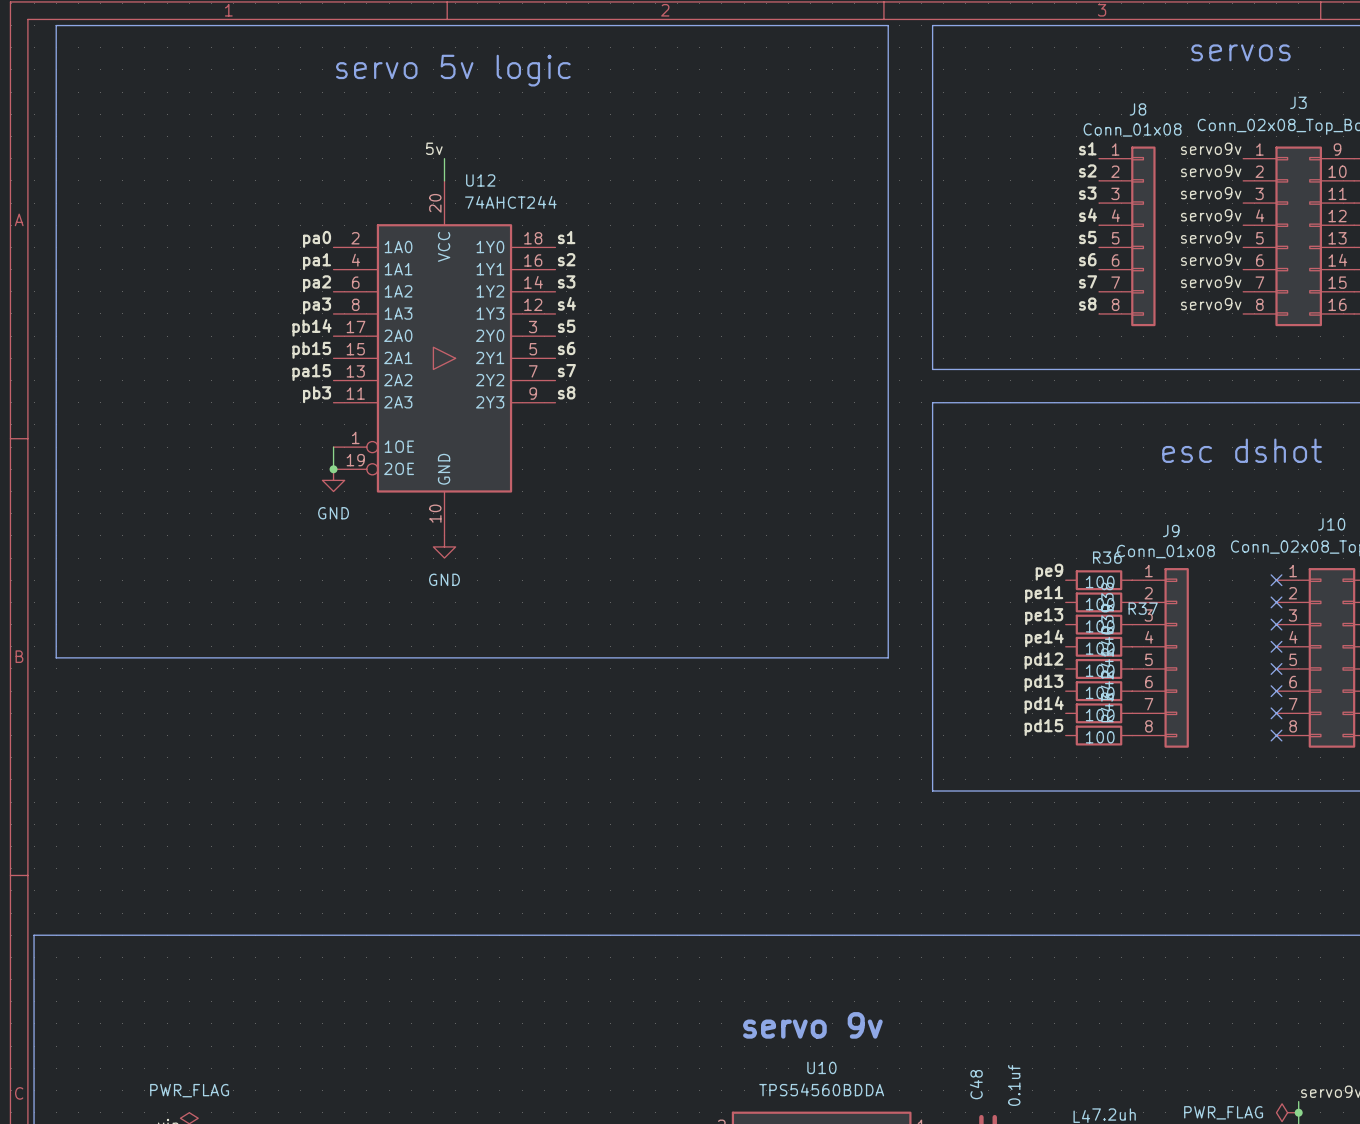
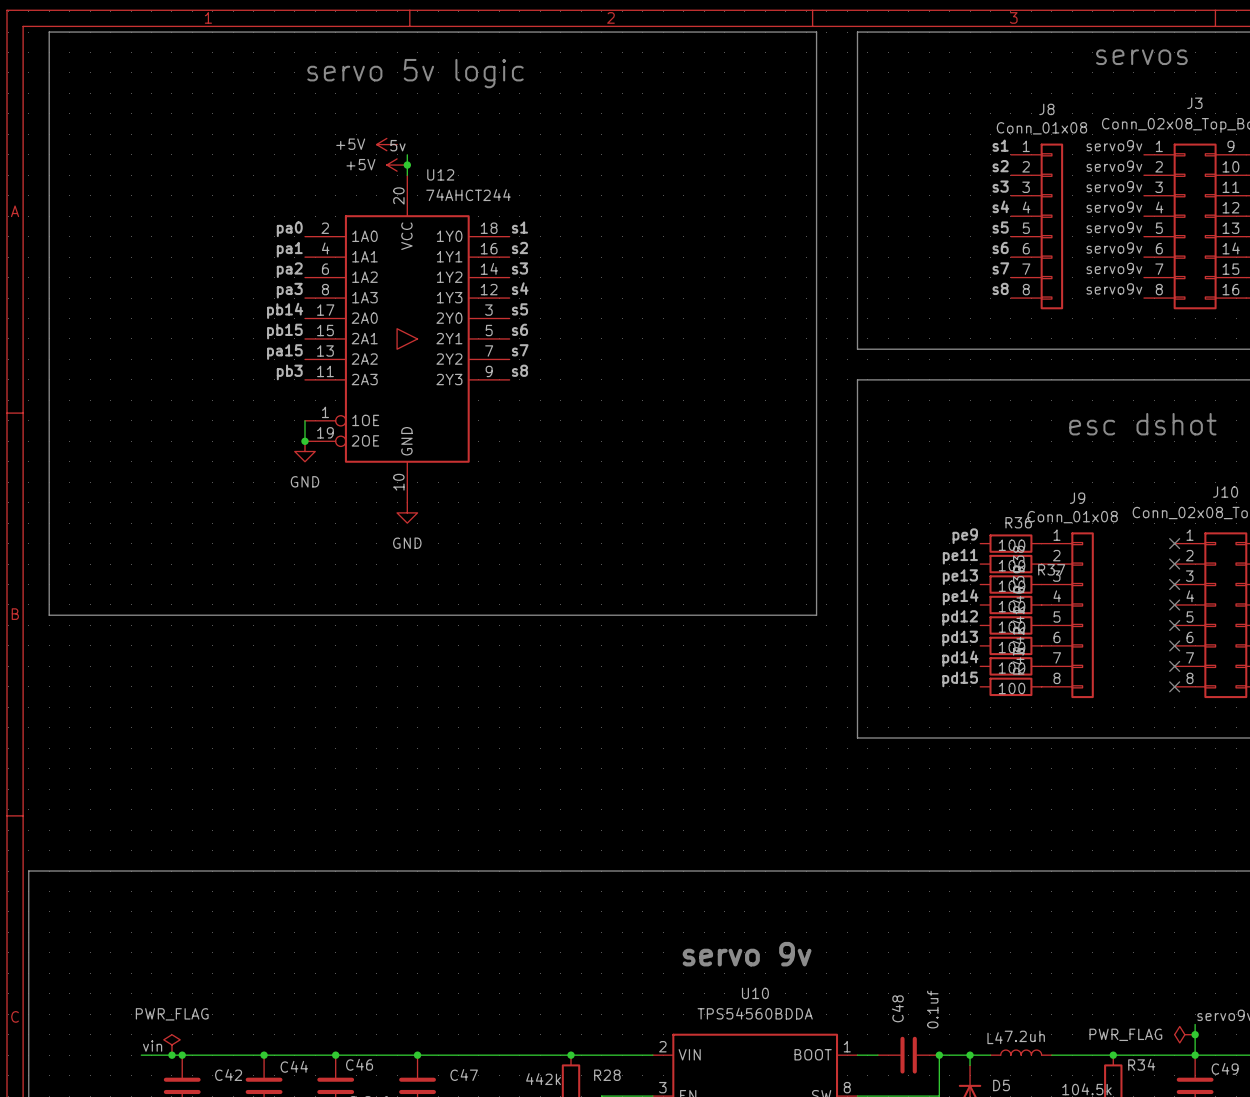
power symbol: none -> +5V (386, 144)
power symbol: none -> +5V (397, 165)
junction: none -> (407, 165)

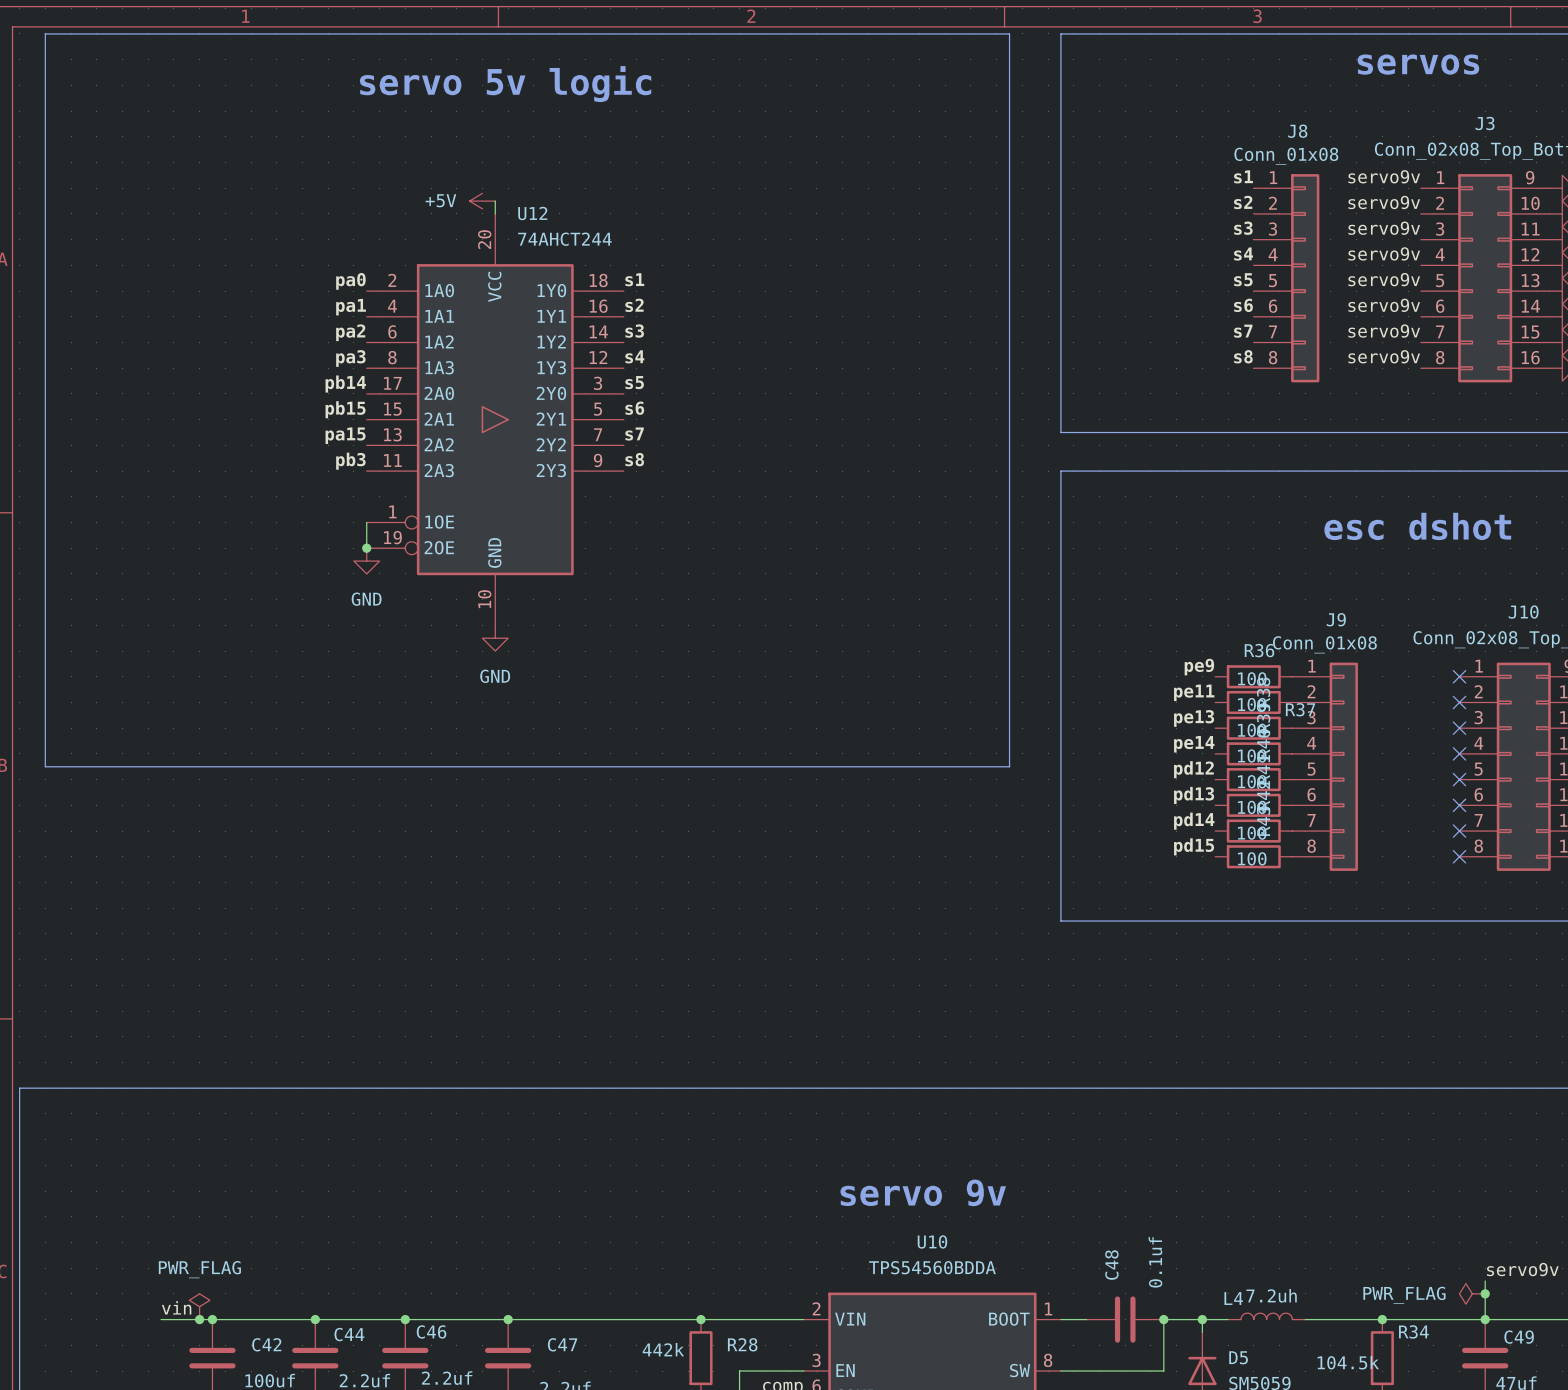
power symbol: +5V (386, 144) -> none
label: 5v (397, 145) -> none
wire: (407, 154) (407, 165) -> none
junction: (407, 165) -> none

